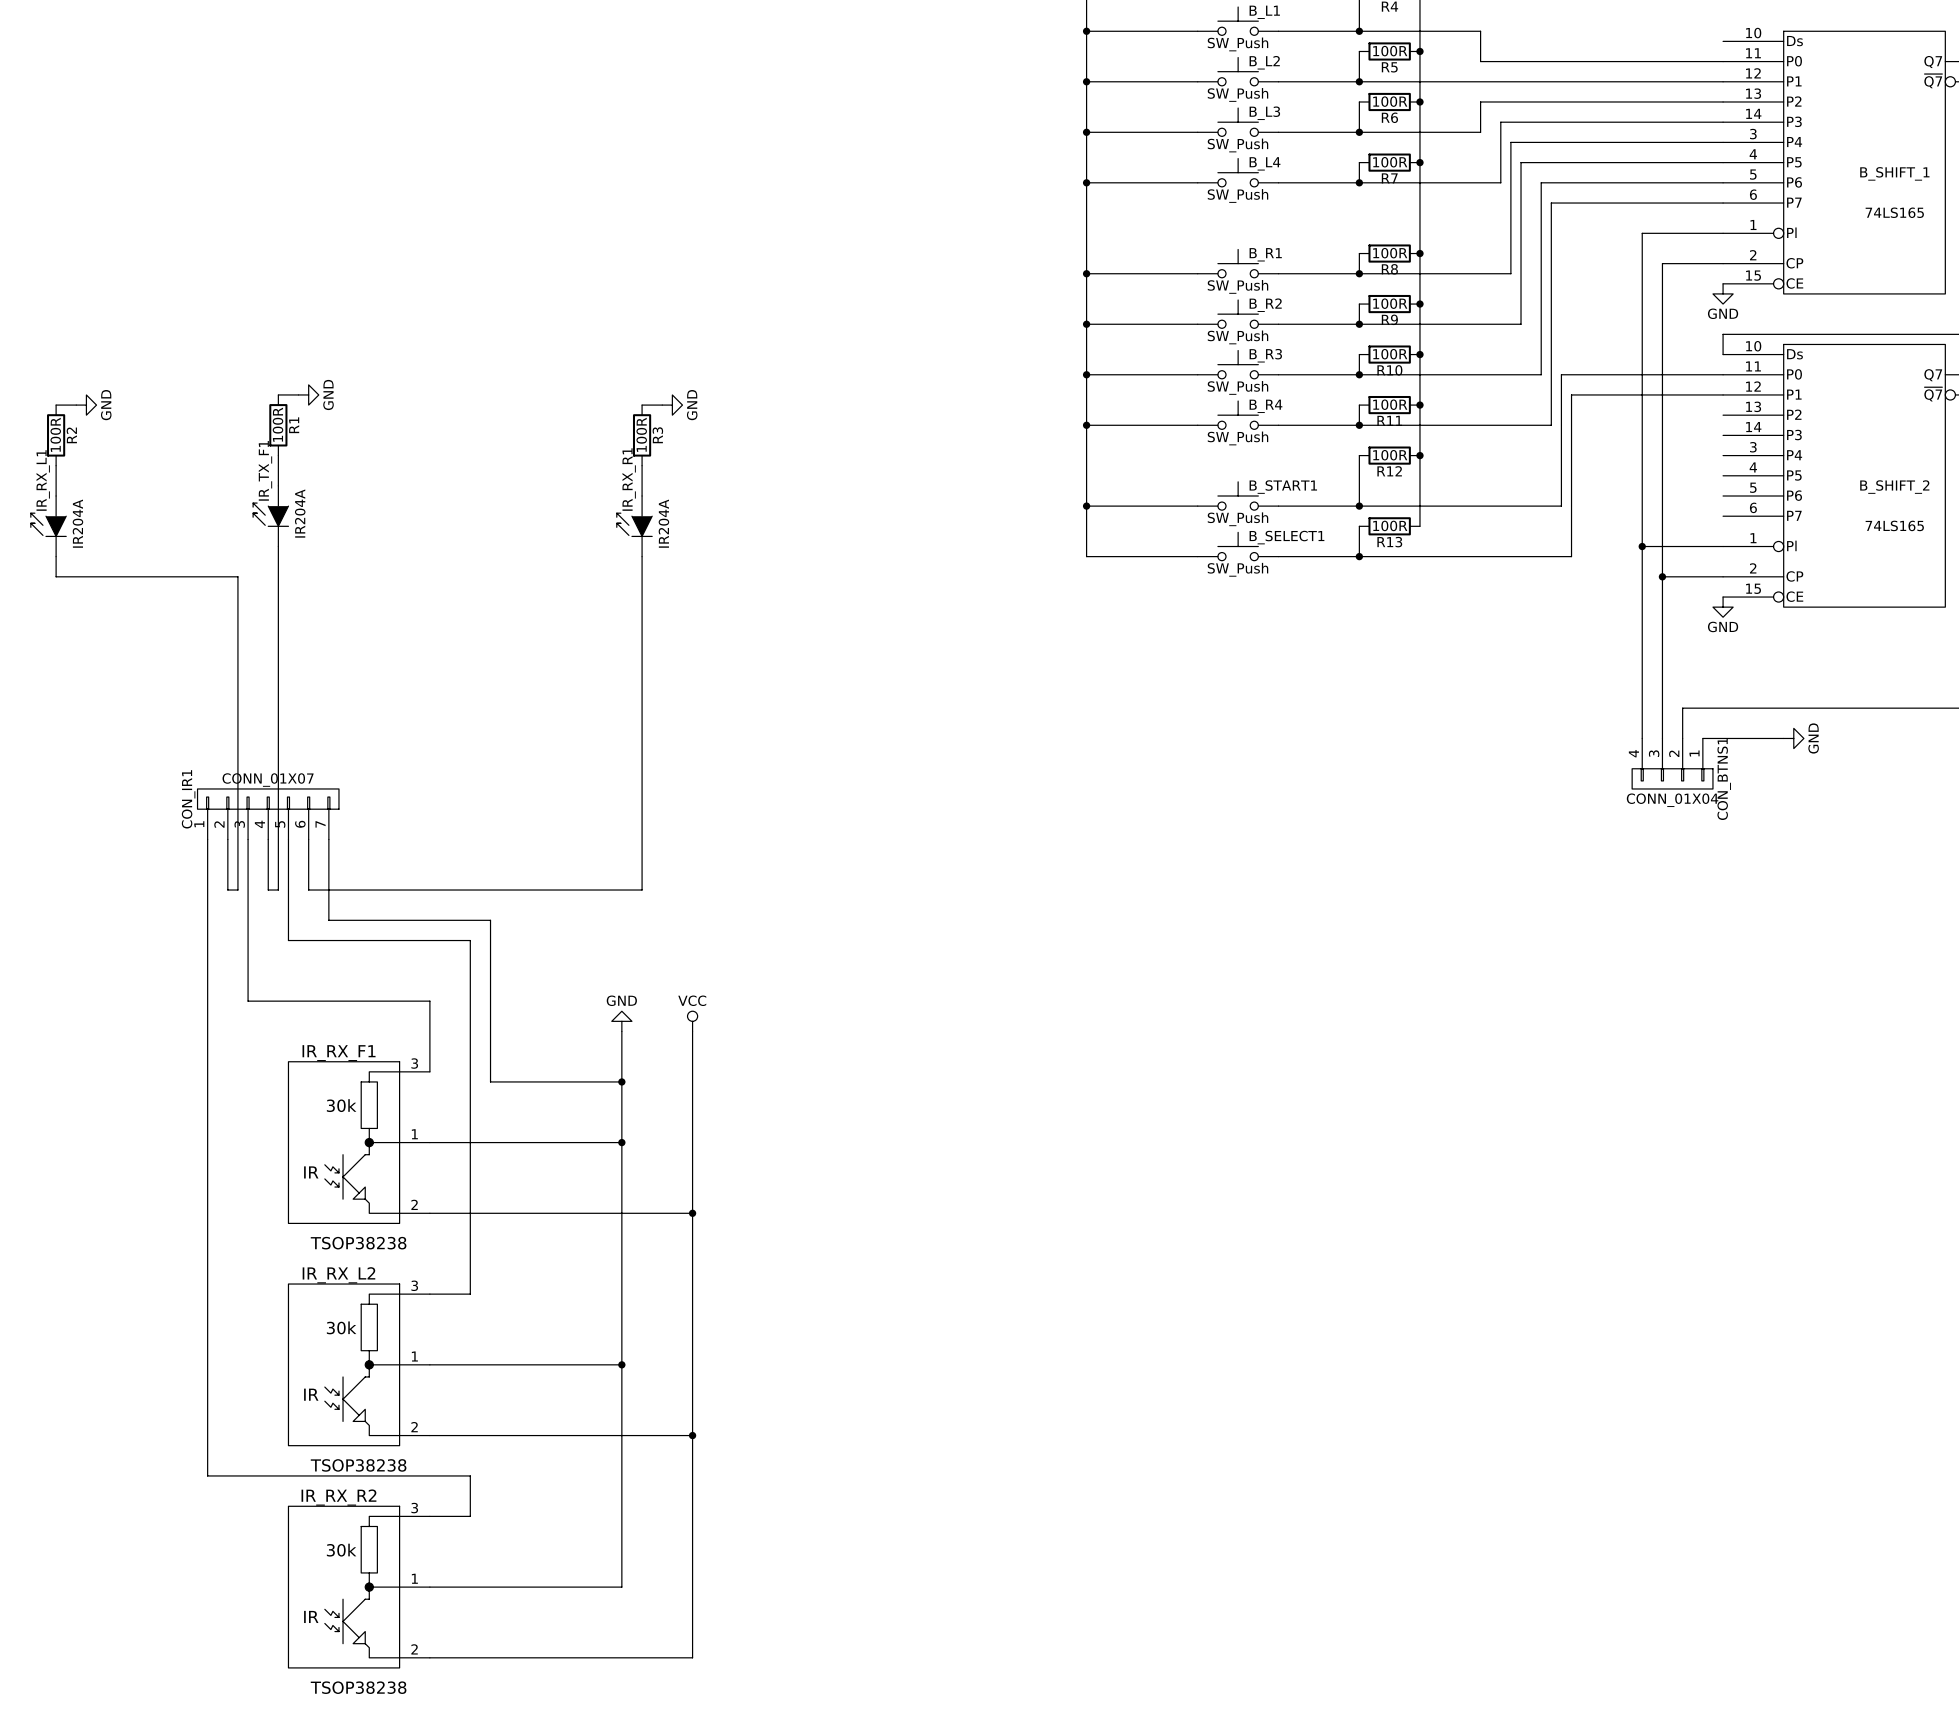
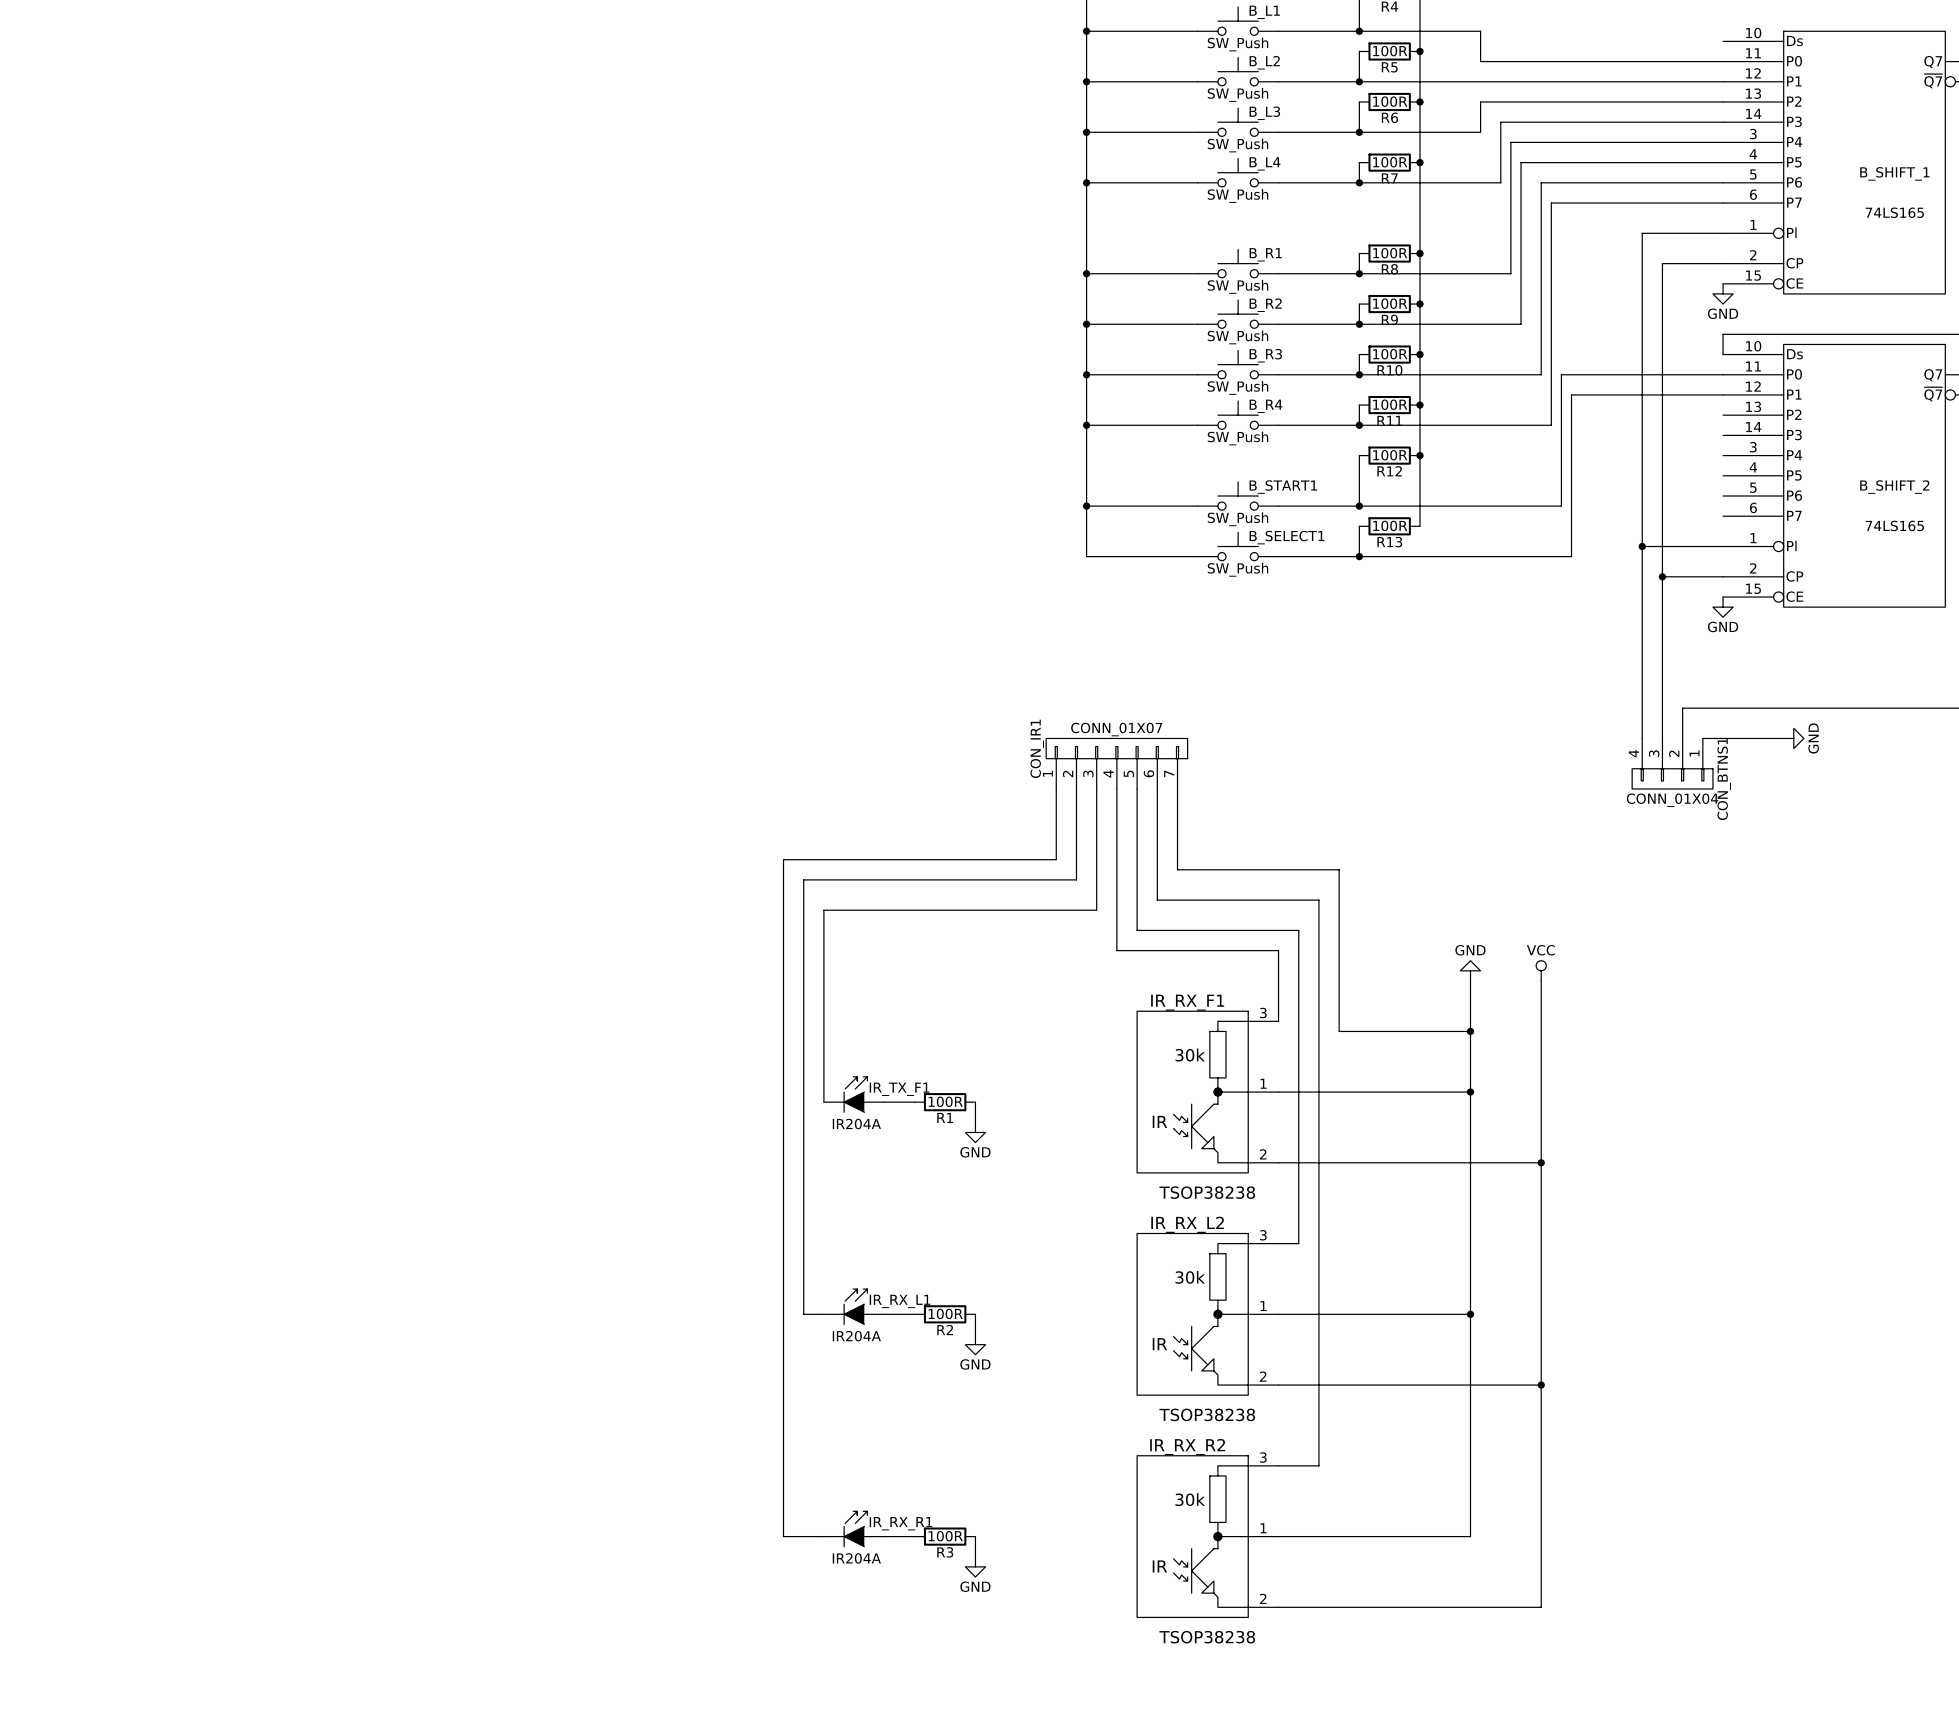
wire: (278, 394) (298, 394) -> none
power symbol: GND (308, 394) -> none
wire: (56, 405) (76, 405) -> none
power symbol: GND (86, 405) -> none
wire: (642, 405) (662, 405) -> none
power symbol: GND (672, 405) -> none
R1 rotation: 0° (278, 425) -> 90° clockwise (945, 1102)
R1 position: (278, 425) -> (945, 1102)
R2 rotation: 0° (56, 435) -> 90° clockwise (945, 1314)
R2 position: (56, 435) -> (945, 1314)
R3 rotation: 0° (642, 435) -> 90° clockwise (945, 1536)
R3 position: (642, 435) -> (945, 1536)
wire: (278, 455) (278, 485) -> none
wire: (56, 465) (56, 496) -> none
wire: (642, 465) (642, 496) -> none
IR_TX_F1 rotation: 0° (271, 514) -> 90° clockwise (855, 1094)
IR_TX_F1 position: (271, 516) -> (854, 1094)
IR_RX_L1 rotation: 0° (48, 525) -> 90° clockwise (855, 1307)
IR_RX_R1 rotation: 0° (634, 525) -> 90° clockwise (855, 1529)
IR_RX_L1 position: (48, 526) -> (854, 1307)
IR_RX_R1 position: (634, 526) -> (854, 1529)
wire: (278, 546) (278, 890) (268, 890) (268, 839) -> none
wire: (56, 556) (56, 576) (237, 576) (237, 890) (227, 890) (227, 839) -> none
wire: (642, 556) (642, 890) (308, 890) (308, 839) -> none
wire: none -> (1056, 788) (1056, 859) (783, 859) (783, 1536) (823, 1536)
wire: none -> (1076, 788) (1076, 879) (803, 879) (803, 1314) (823, 1314)
wire: none -> (1096, 788) (1096, 910) (823, 910) (823, 1102)
wire: none -> (1116, 788) (1116, 950) (1278, 950) (1278, 1021)
wire: none -> (1137, 788) (1137, 930) (1298, 930) (1298, 1243) (1278, 1243)
wire: none -> (1157, 788) (1157, 900) (1318, 900) (1318, 1465) (1278, 1465)
wire: none -> (1177, 788) (1177, 869) (1339, 869) (1339, 1031) (1470, 1031)
CON_IR1 position: (268, 814) -> (1116, 763)
wire: (207, 839) (207, 1475) (470, 1475) (470, 1516) (429, 1516) -> none
wire: (248, 839) (248, 1001) (429, 1001) (429, 1071) -> none
wire: (288, 839) (288, 940) (470, 940) (470, 1294) (429, 1294) -> none
wire: (328, 839) (328, 920) (490, 920) (490, 1081) (621, 1081) -> none
power symbol: none -> GND (1470, 970)
power symbol: none -> VCC (1541, 970)
wire: none -> (1470, 980) (1470, 1536) (1278, 1536)
wire: none -> (1541, 980) (1541, 1607) (1278, 1607)
power symbol: GND (621, 1021) -> none
power symbol: VCC (692, 1021) -> none
wire: (621, 1031) (621, 1587) (429, 1587) -> none
wire: (692, 1031) (692, 1657) (429, 1657) -> none
junction: none -> (1470, 1031)
junction: (621, 1081) -> none
wire: none -> (1278, 1092) (1470, 1092)
junction: none -> (1470, 1092)
wire: none -> (884, 1102) (914, 1102)
wire: none -> (975, 1102) (975, 1122)
power symbol: none -> GND (975, 1132)
IR_RX_F1 position: (359, 1142) -> (1207, 1092)
wire: (429, 1142) (621, 1142) -> none
junction: (621, 1142) -> none
wire: none -> (1278, 1162) (1541, 1162)
junction: none -> (1541, 1162)
wire: (429, 1213) (692, 1213) -> none
junction: (692, 1213) -> none
wire: none -> (884, 1314) (914, 1314)
wire: none -> (975, 1314) (975, 1334)
wire: none -> (1278, 1314) (1470, 1314)
junction: none -> (1470, 1314)
power symbol: none -> GND (975, 1344)
IR_RX_L2 position: (359, 1364) -> (1207, 1314)
wire: (429, 1364) (621, 1364) -> none
junction: (621, 1364) -> none
wire: none -> (1278, 1385) (1541, 1385)
junction: none -> (1541, 1385)
wire: (429, 1435) (692, 1435) -> none
junction: (692, 1435) -> none
wire: none -> (884, 1536) (914, 1536)
wire: none -> (975, 1536) (975, 1556)
power symbol: none -> GND (975, 1566)
IR_RX_R2 position: (359, 1587) -> (1207, 1536)

